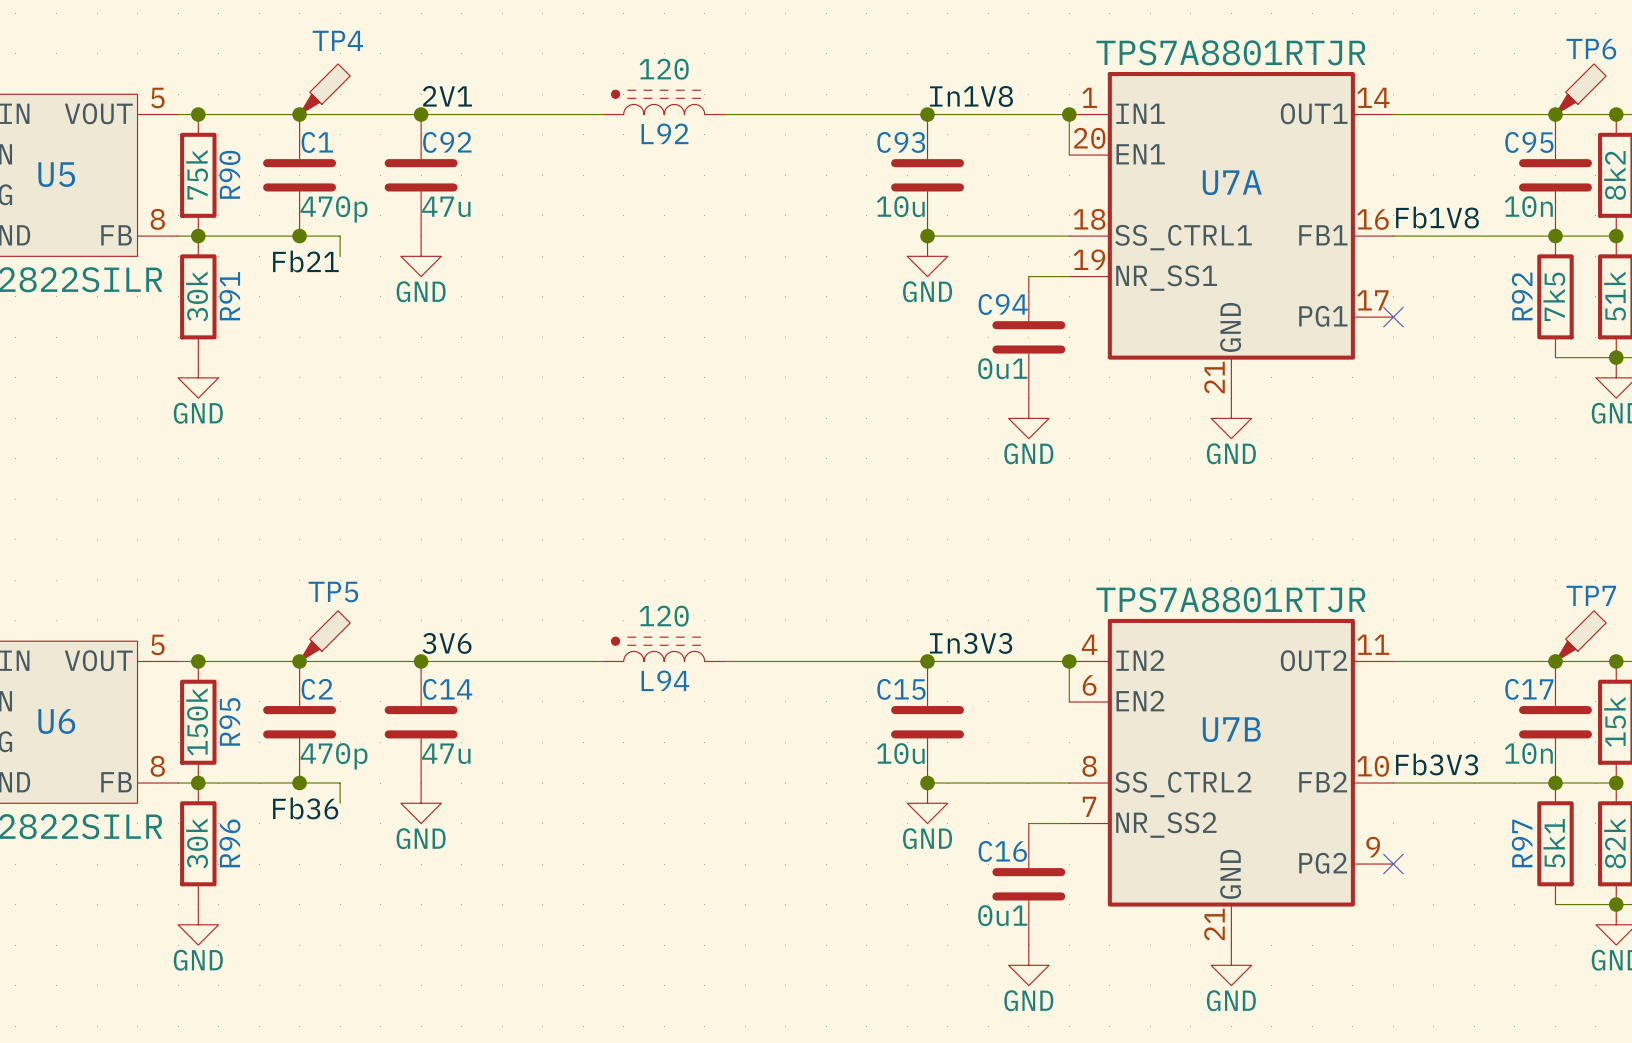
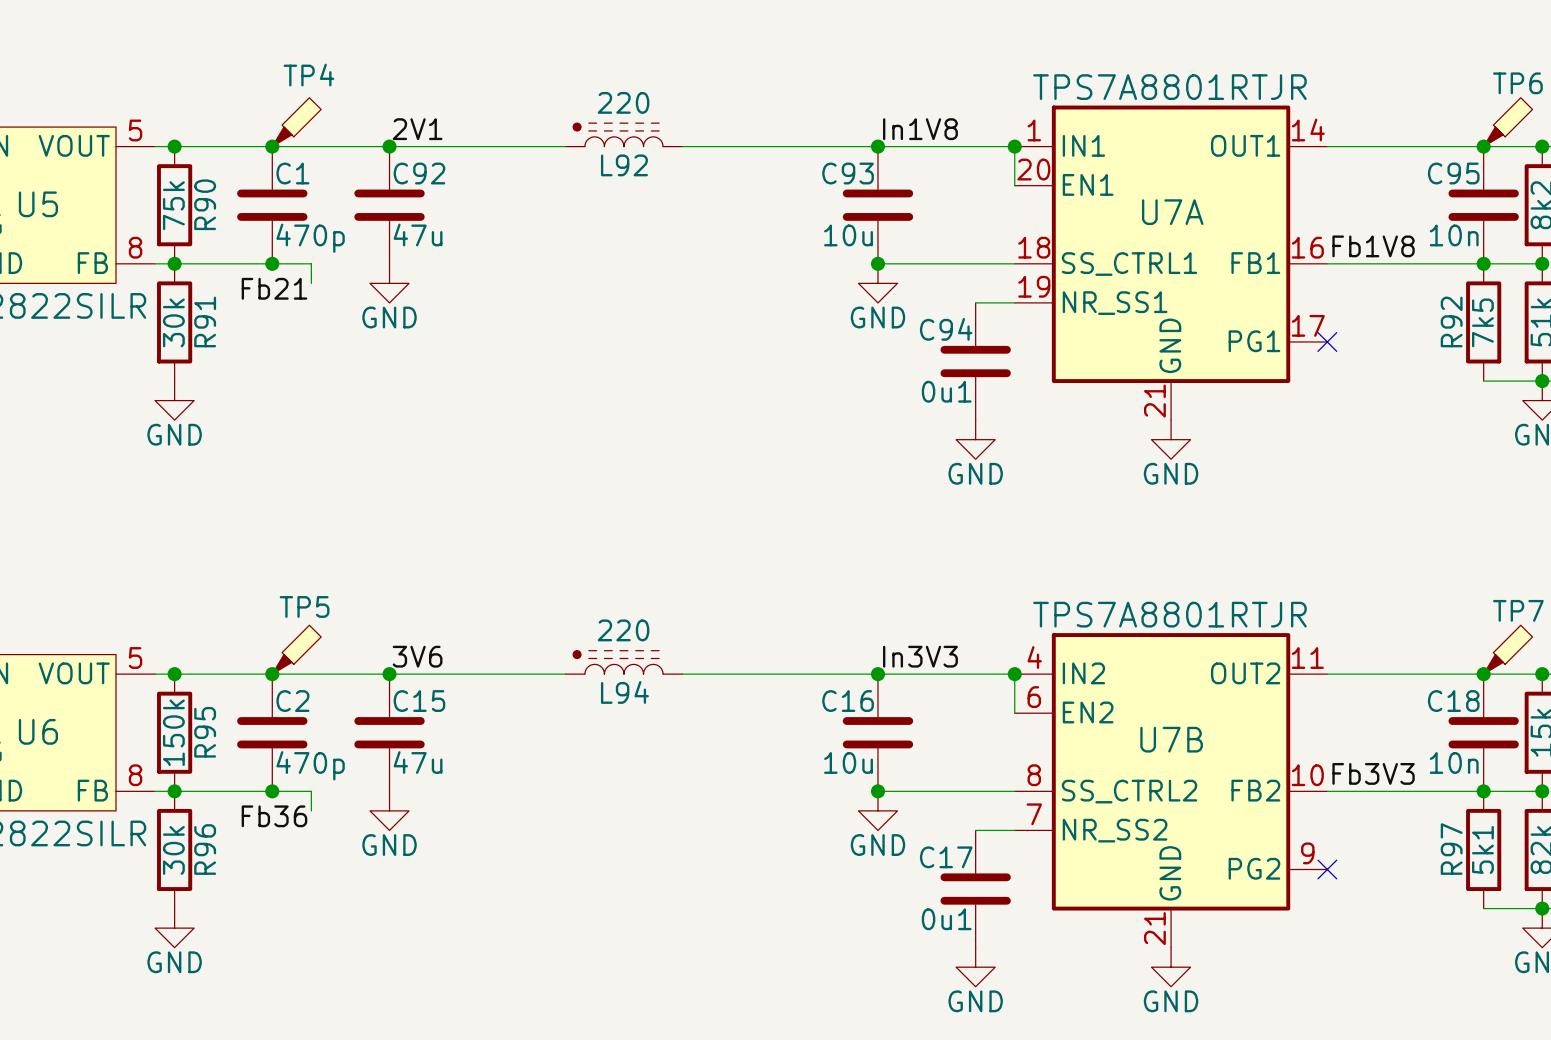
L92 value: 120 (664, 69) -> 220 (623, 102)
L94 value: 120 (664, 616) -> 220 (623, 630)
C14 name: C14 (447, 689) -> C15 (419, 701)
C15 name: C15 (901, 689) -> C16 (848, 701)
C17 name: C17 (1529, 689) -> C18 (1453, 701)
C16 name: C16 (1002, 851) -> C17 (946, 857)

